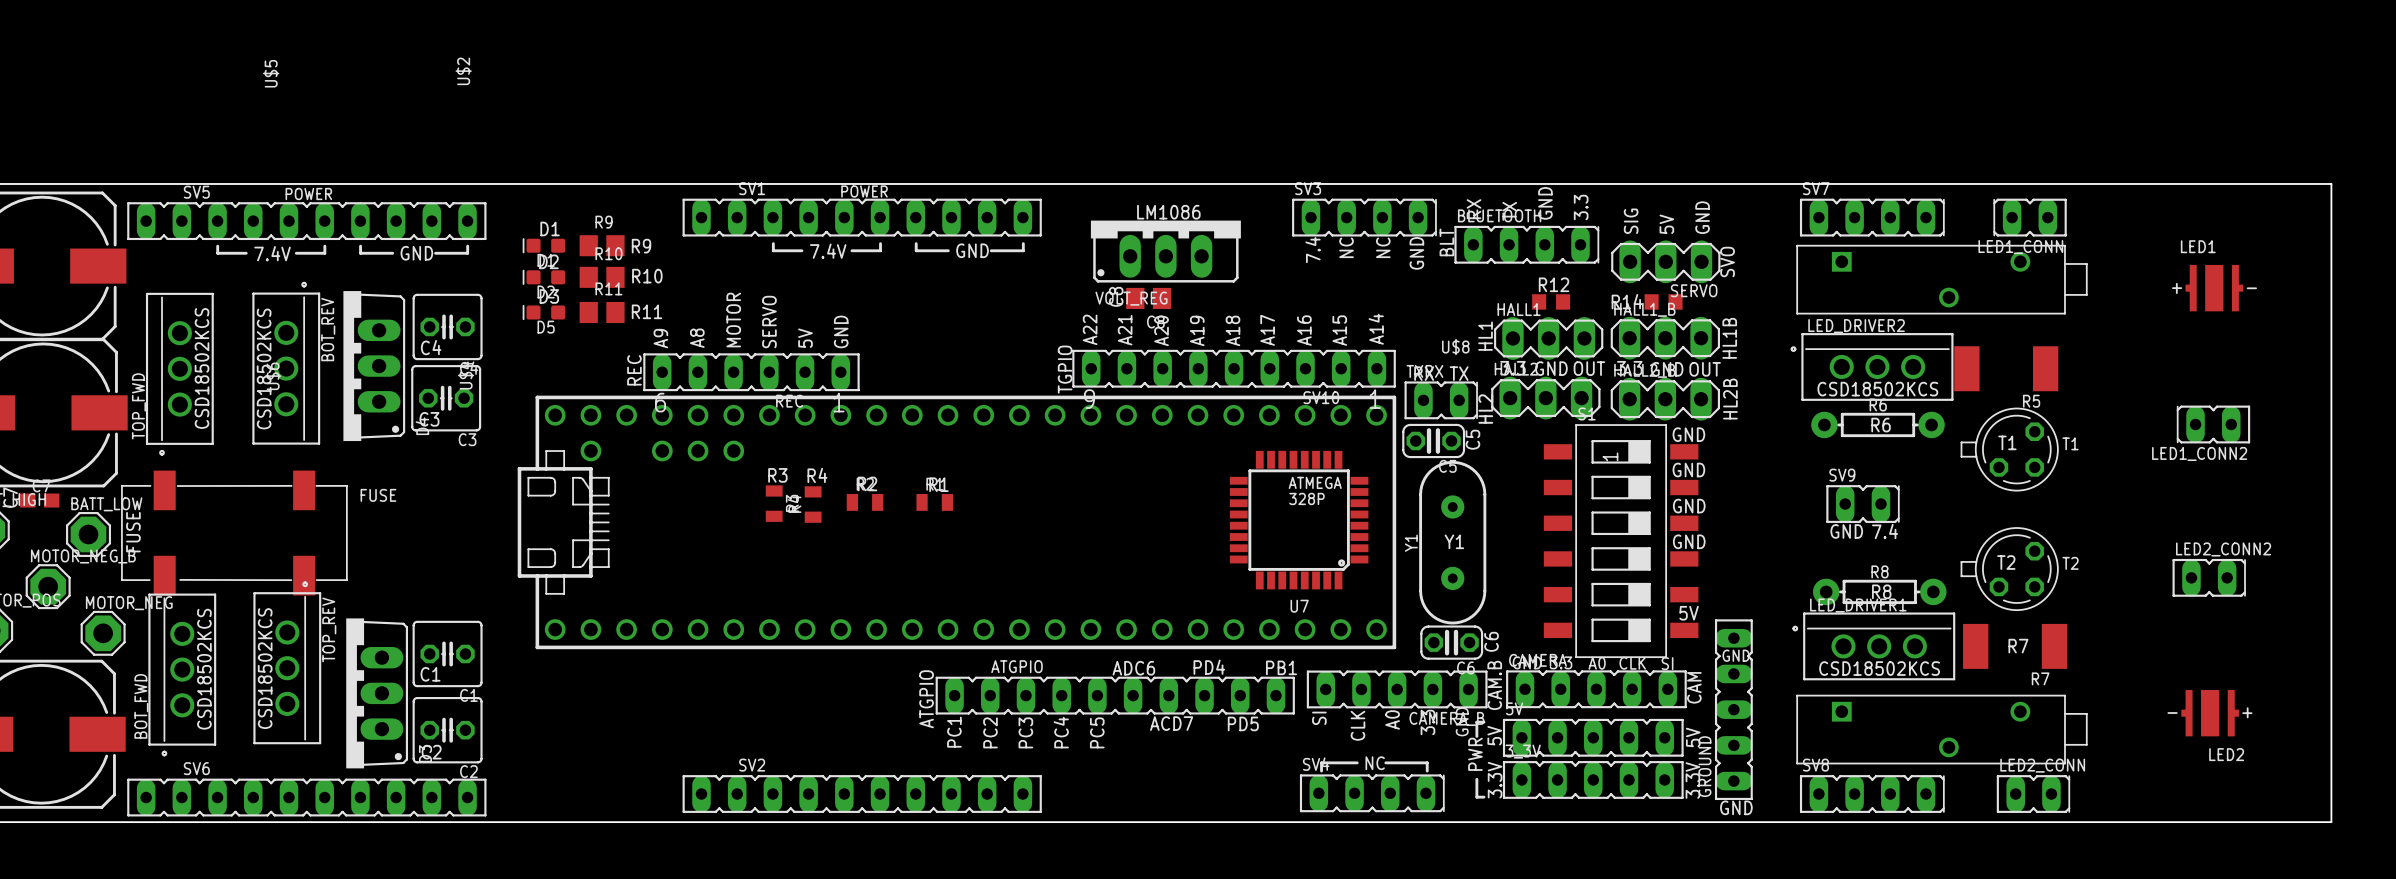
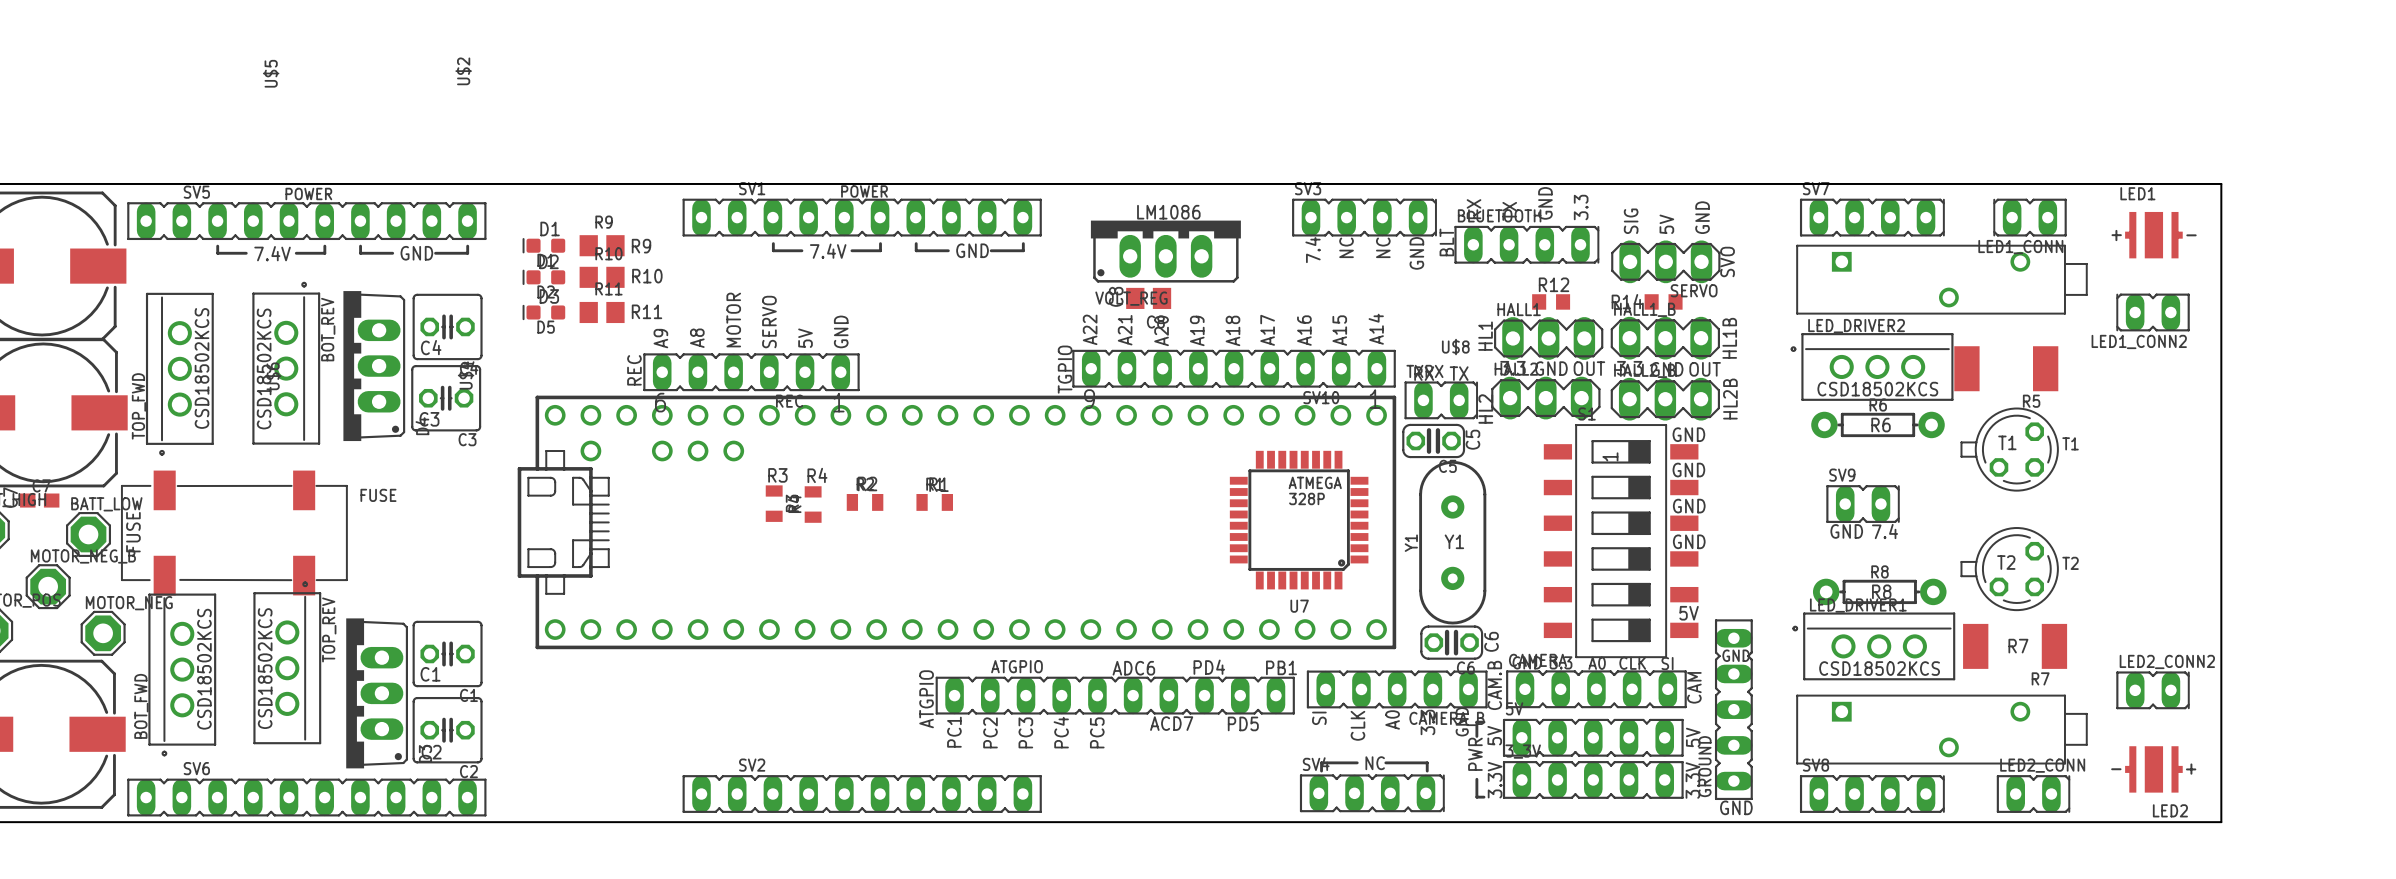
board edge: (2221, 183) (2331, 183) (2331, 822) (2221, 822) -> (2221, 183) (2221, 822)
LED1 position: (2214, 288) -> (2154, 235)
LED1_CONN2 position: (2213, 424) -> (2153, 312)
LED2_CONN2 position: (2209, 577) -> (2153, 690)
LED2 position: (2209, 713) -> (2153, 769)

